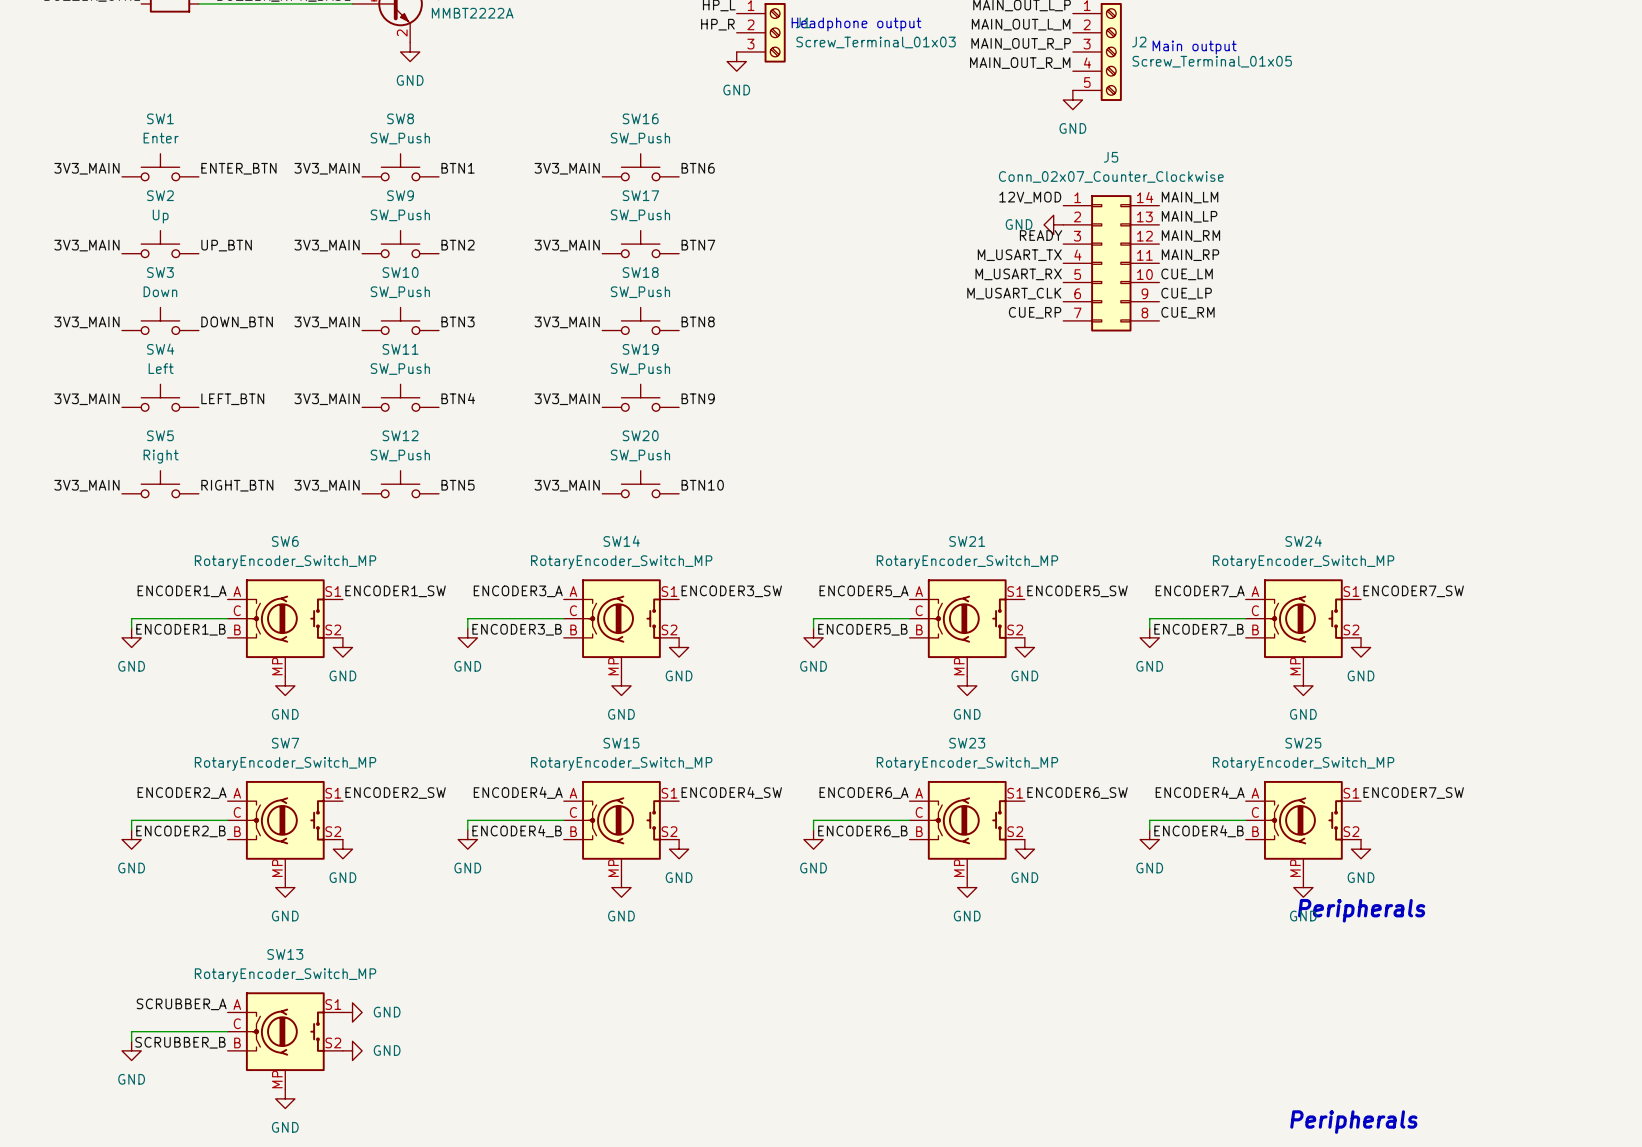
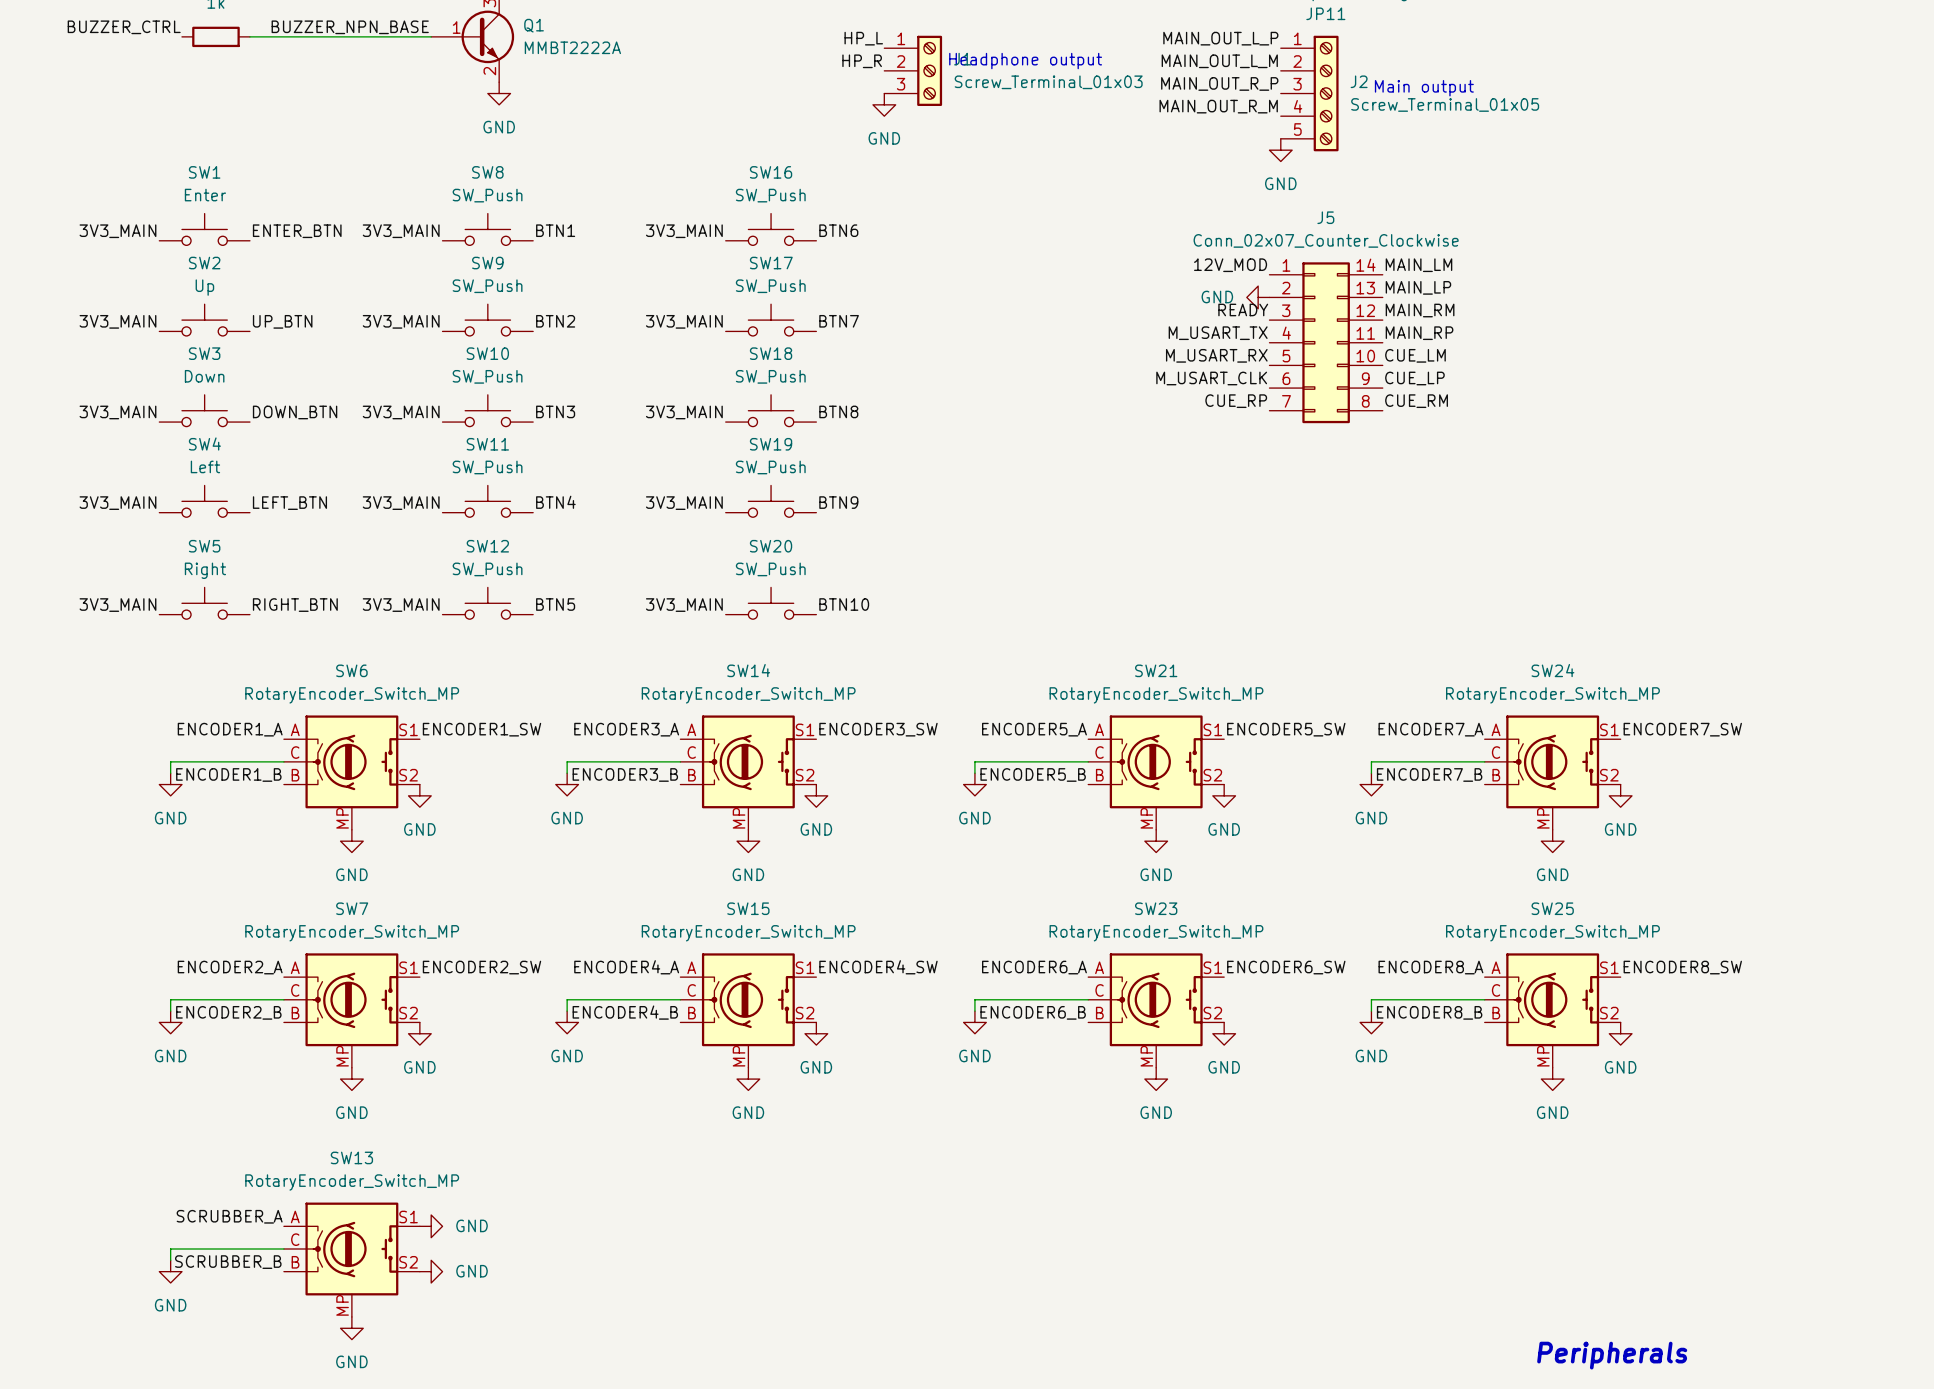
label: ENCODER4_A (1200, 792) -> ENCODER8_A (1430, 967)
label: ENCODER7_SW (1413, 793) -> ENCODER8_SW (1682, 967)
label: ENCODER4_B (1199, 831) -> ENCODER8_B (1429, 1012)
text: Peripherals (1361, 910) -> none

